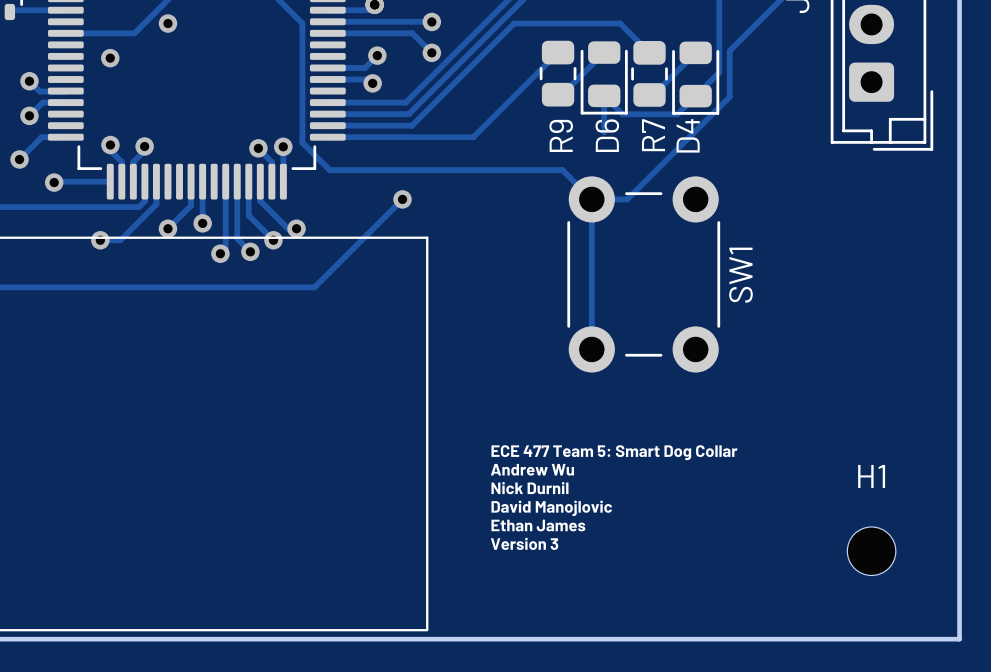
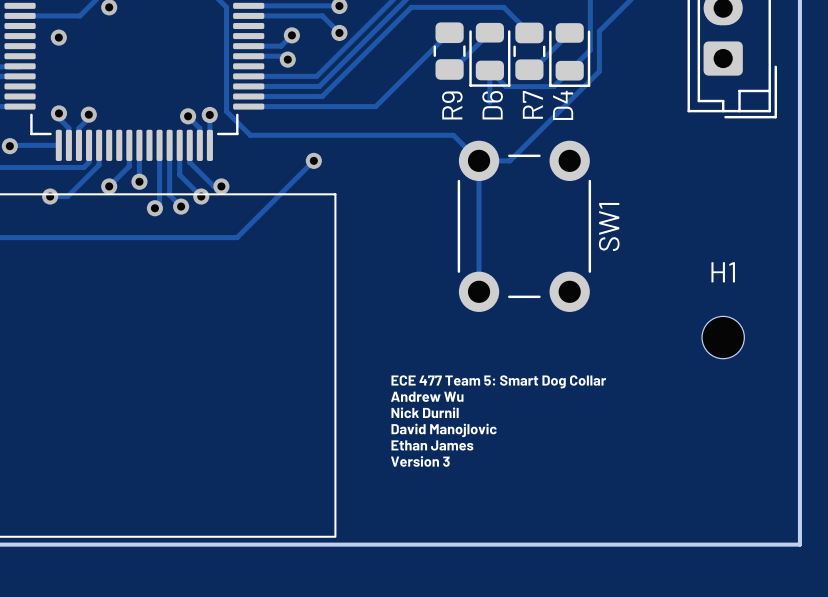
H1 position: (871, 551) -> (723, 337)

